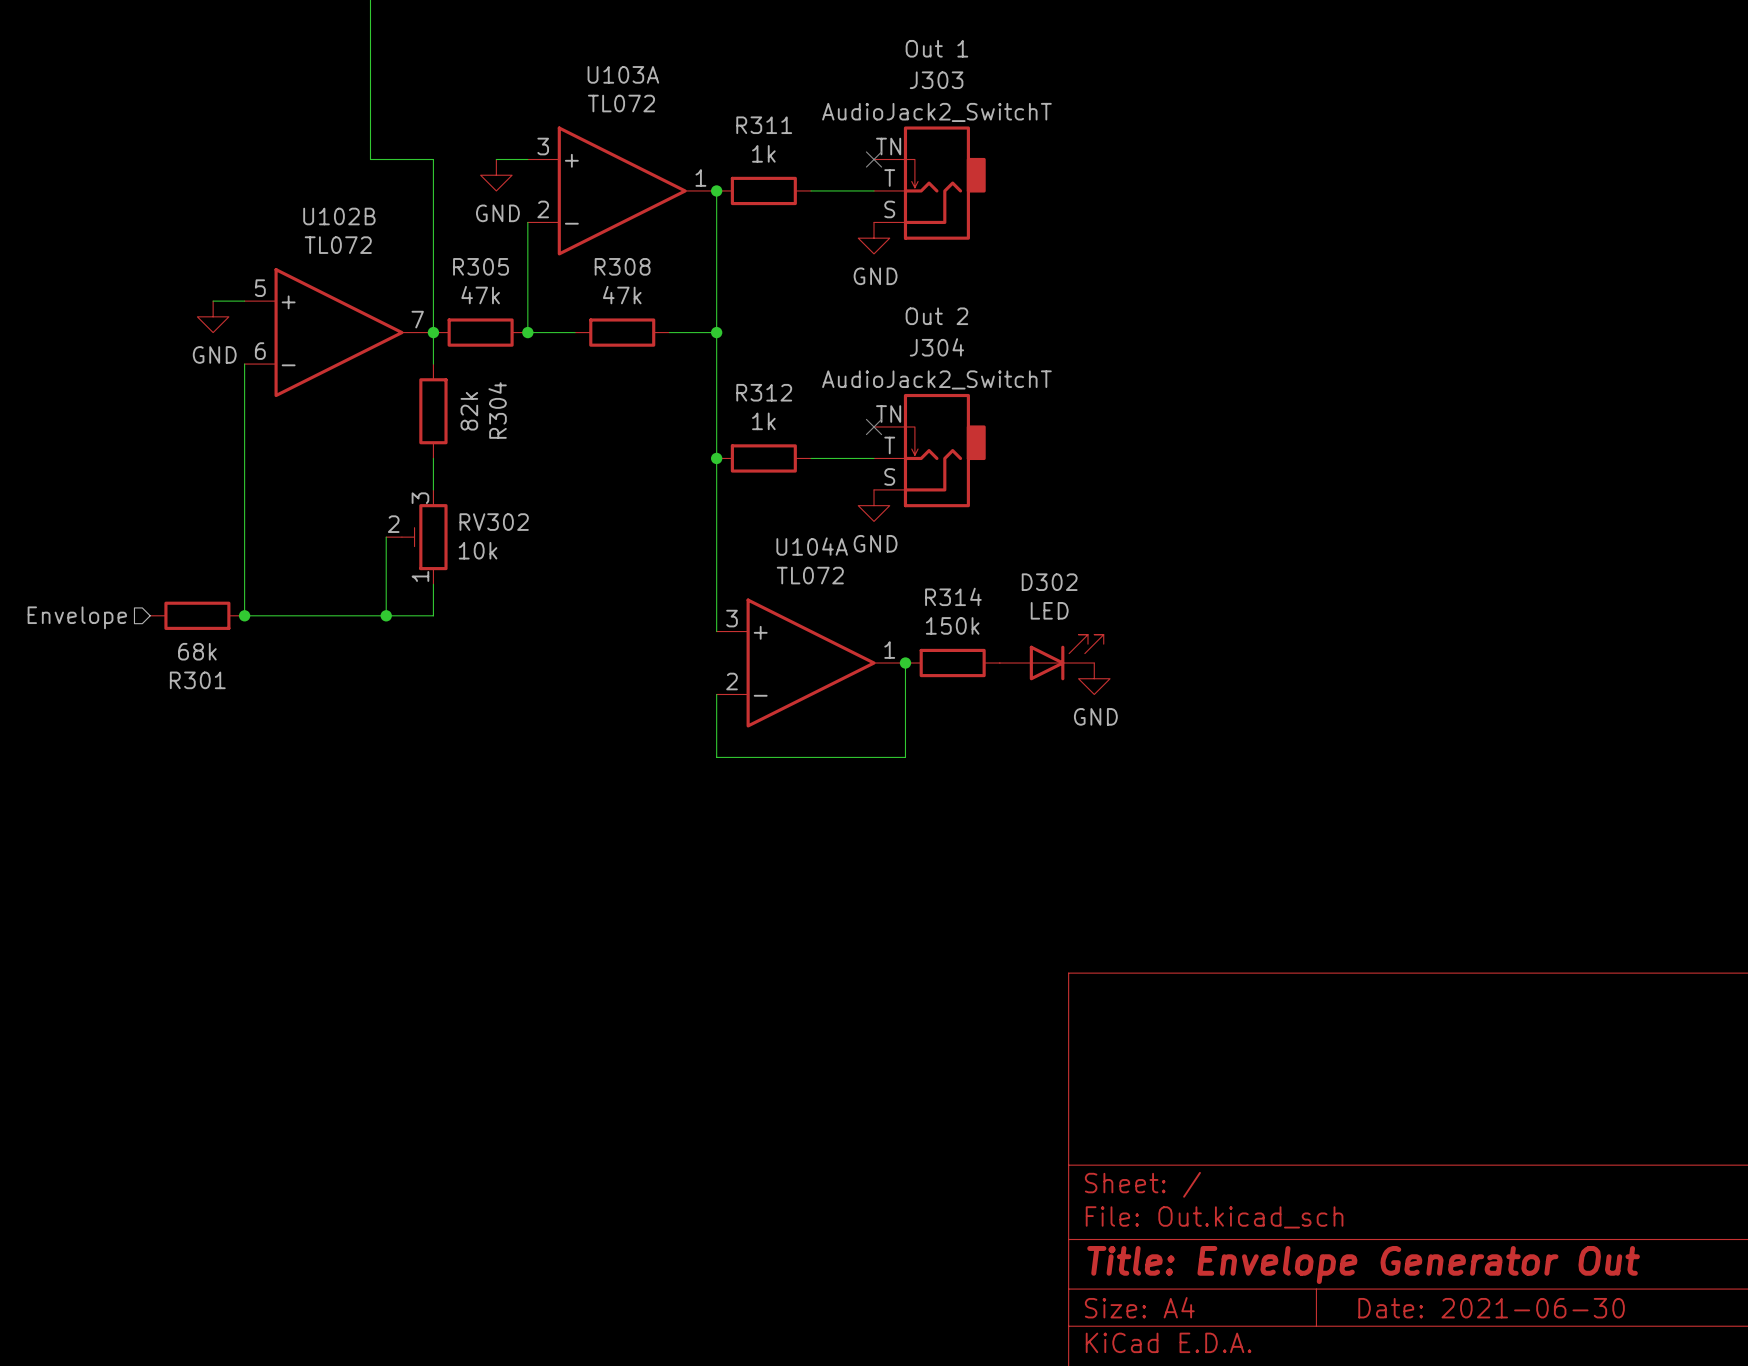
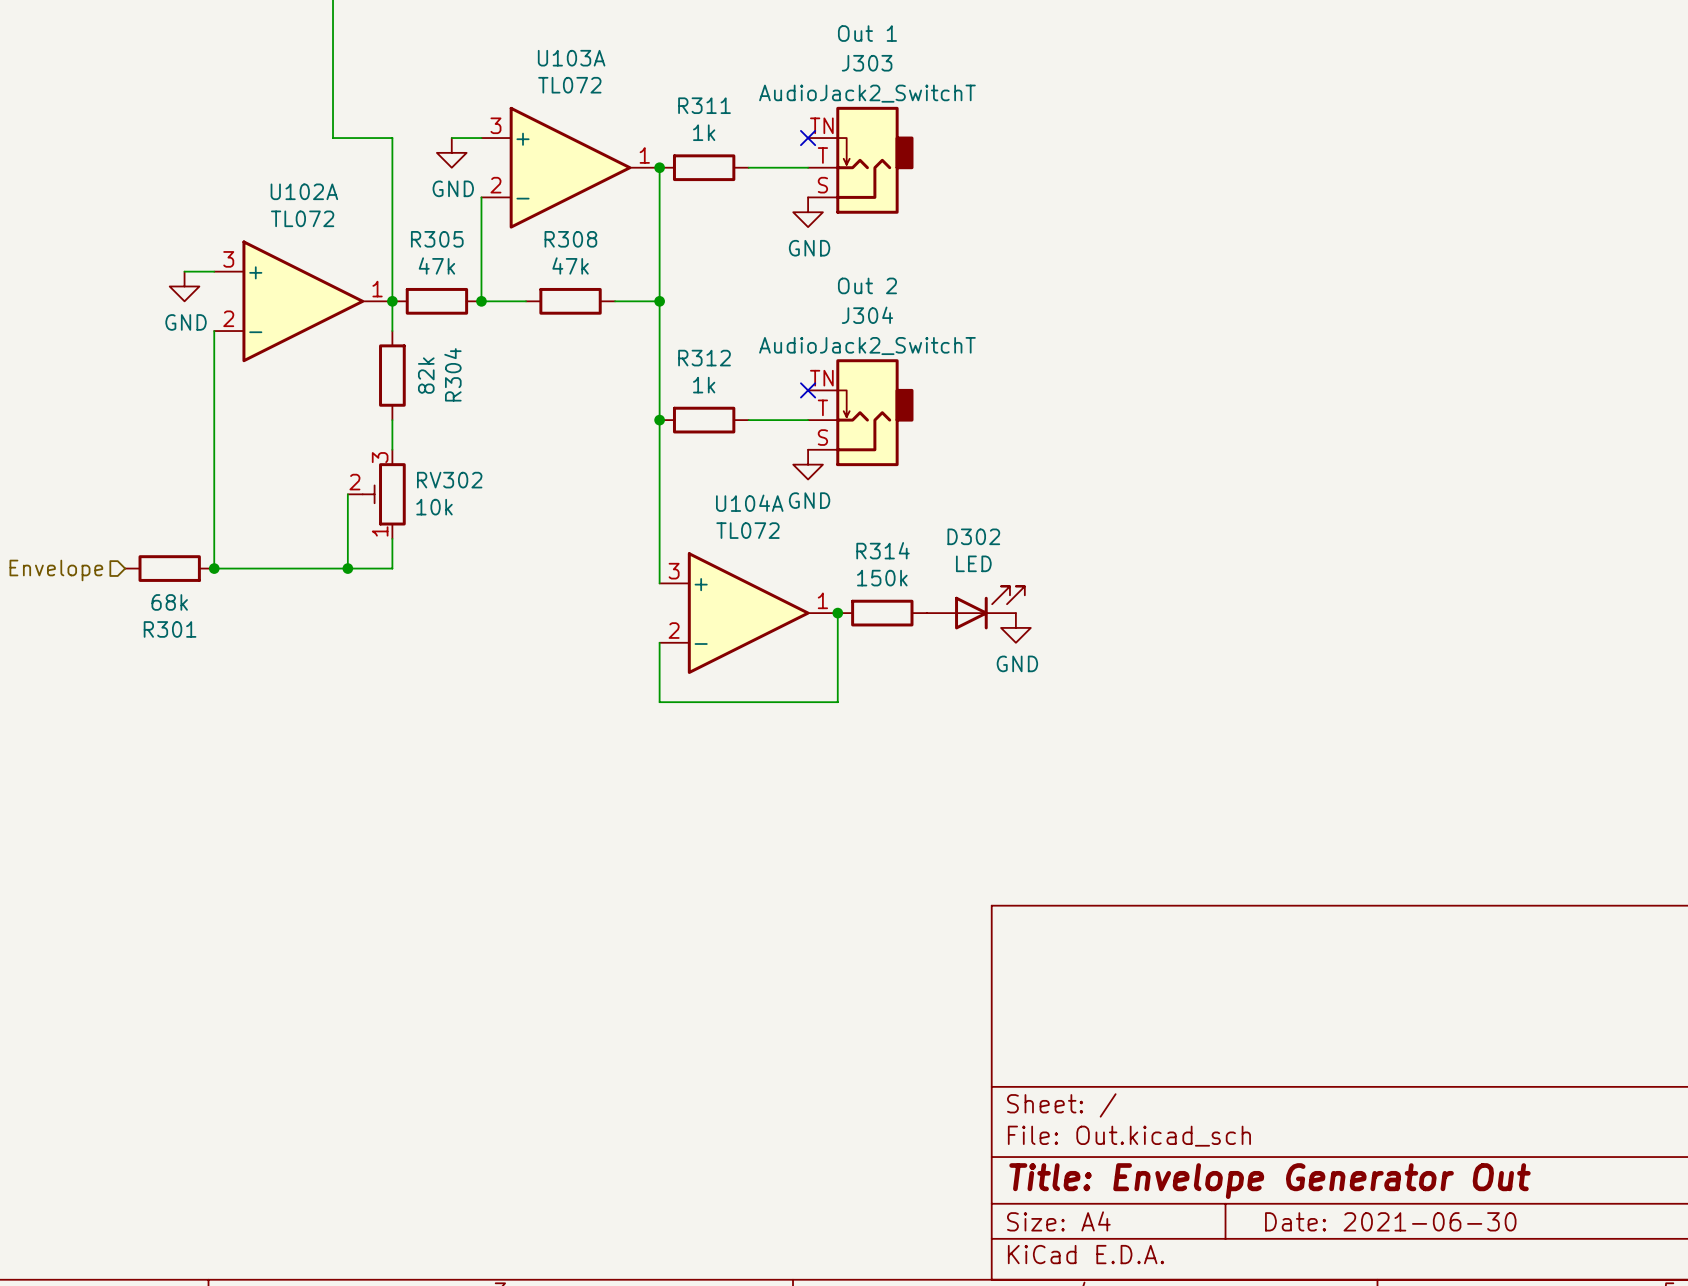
U102B name: U102B (339, 216) -> U102A (304, 191)
U102B pin number: 5 (260, 288) -> 3 (228, 259)
U102B pin number: 7 (417, 319) -> 1 (377, 289)
U102B pin number: 6 (260, 351) -> 2 (228, 318)

